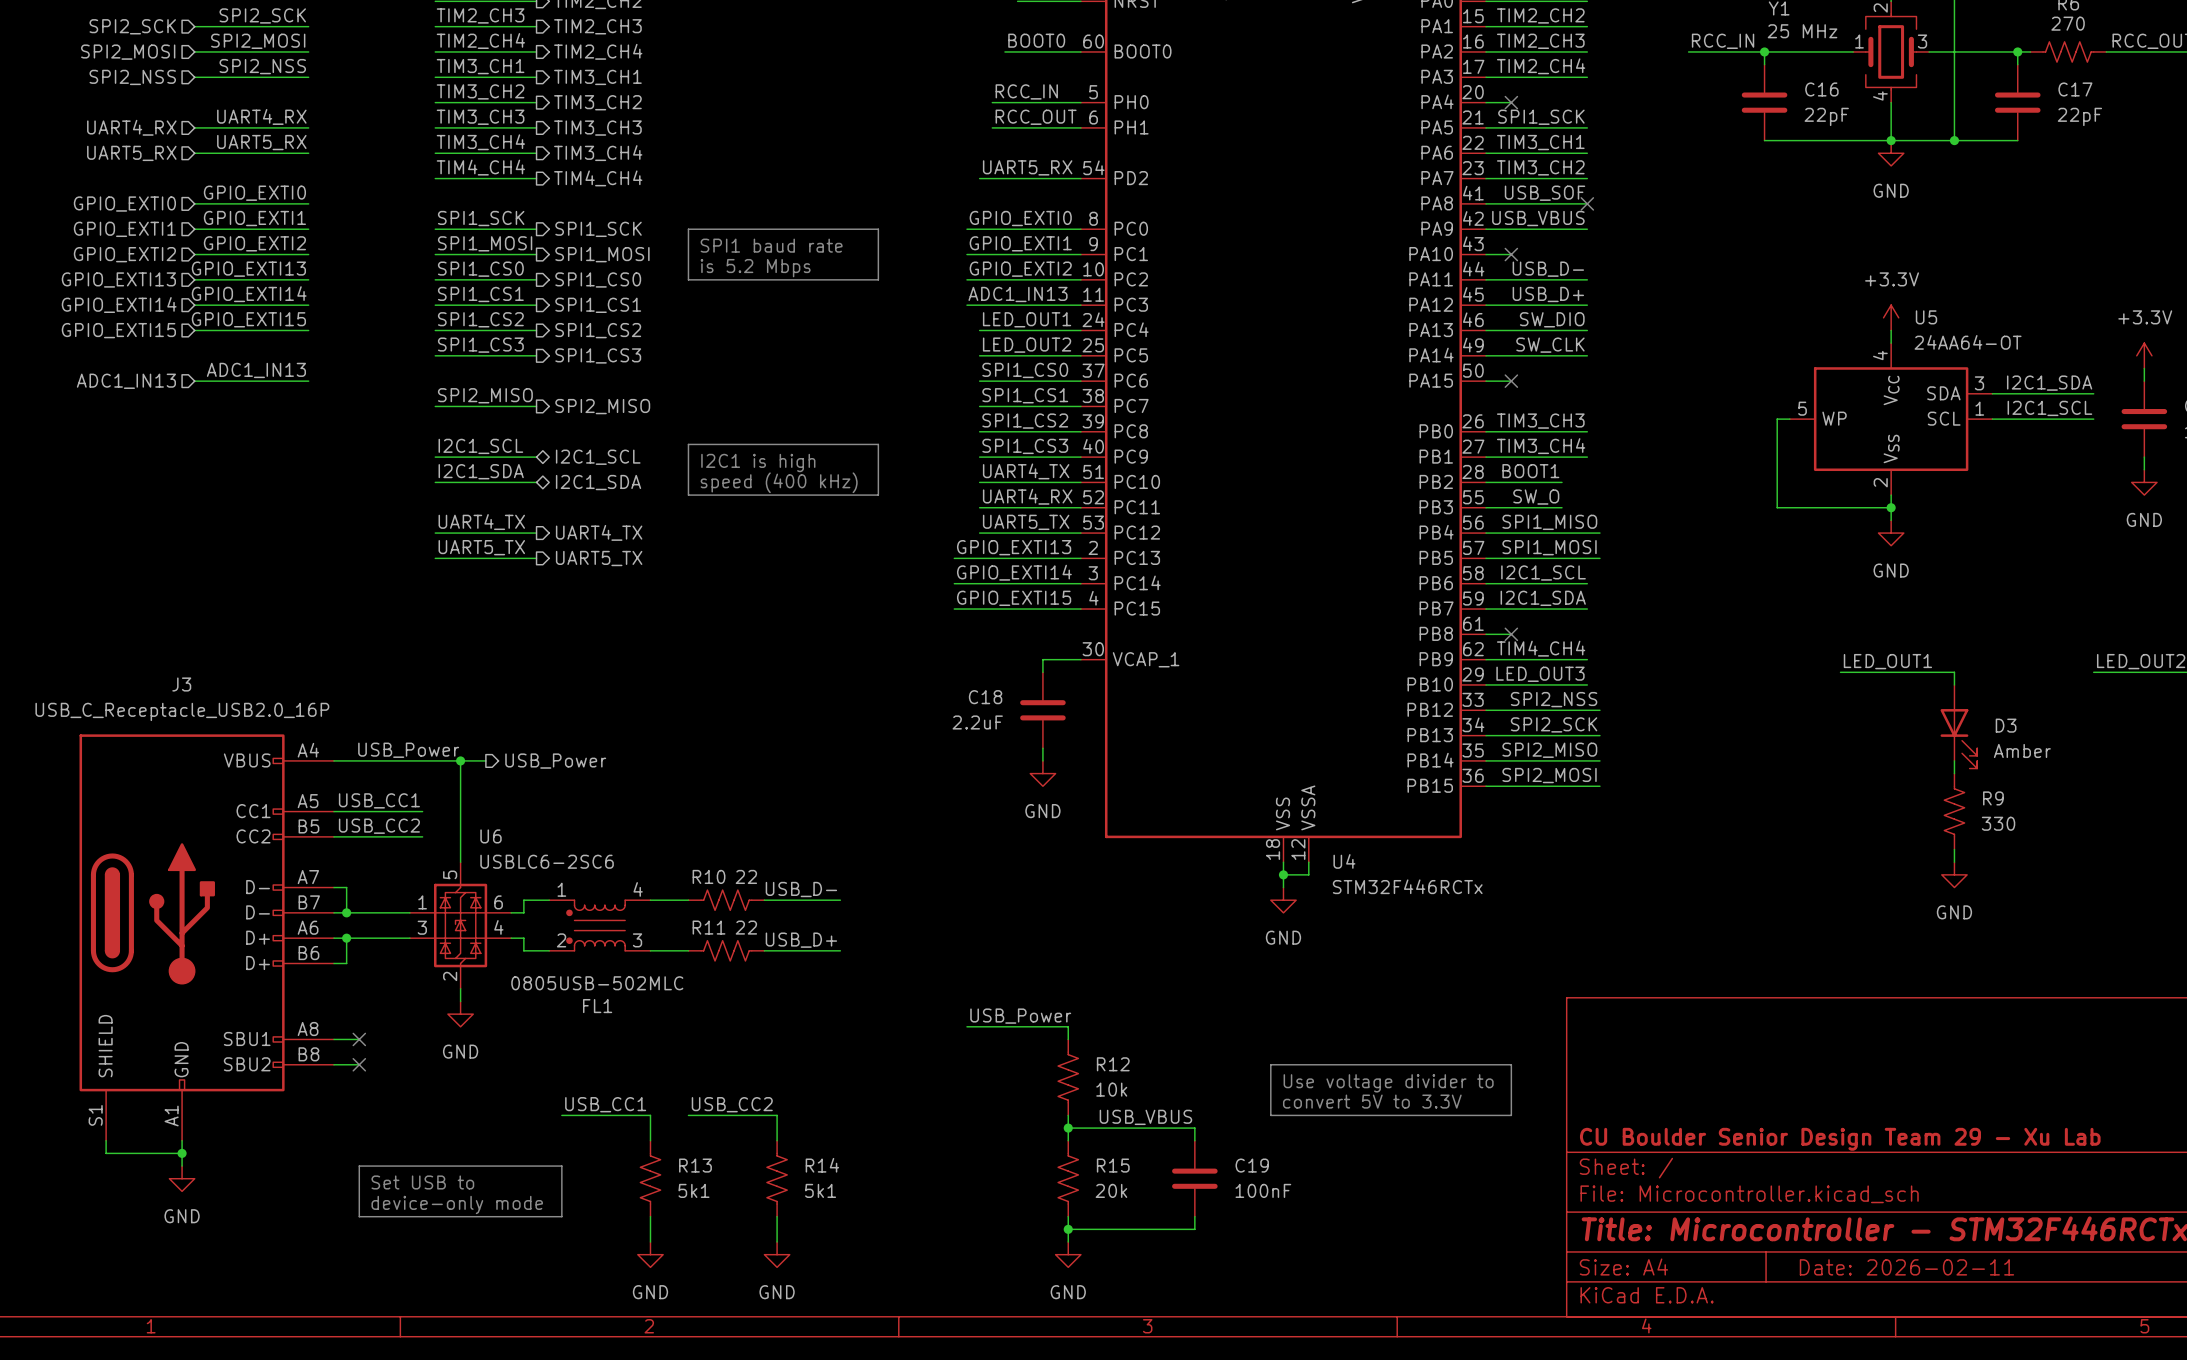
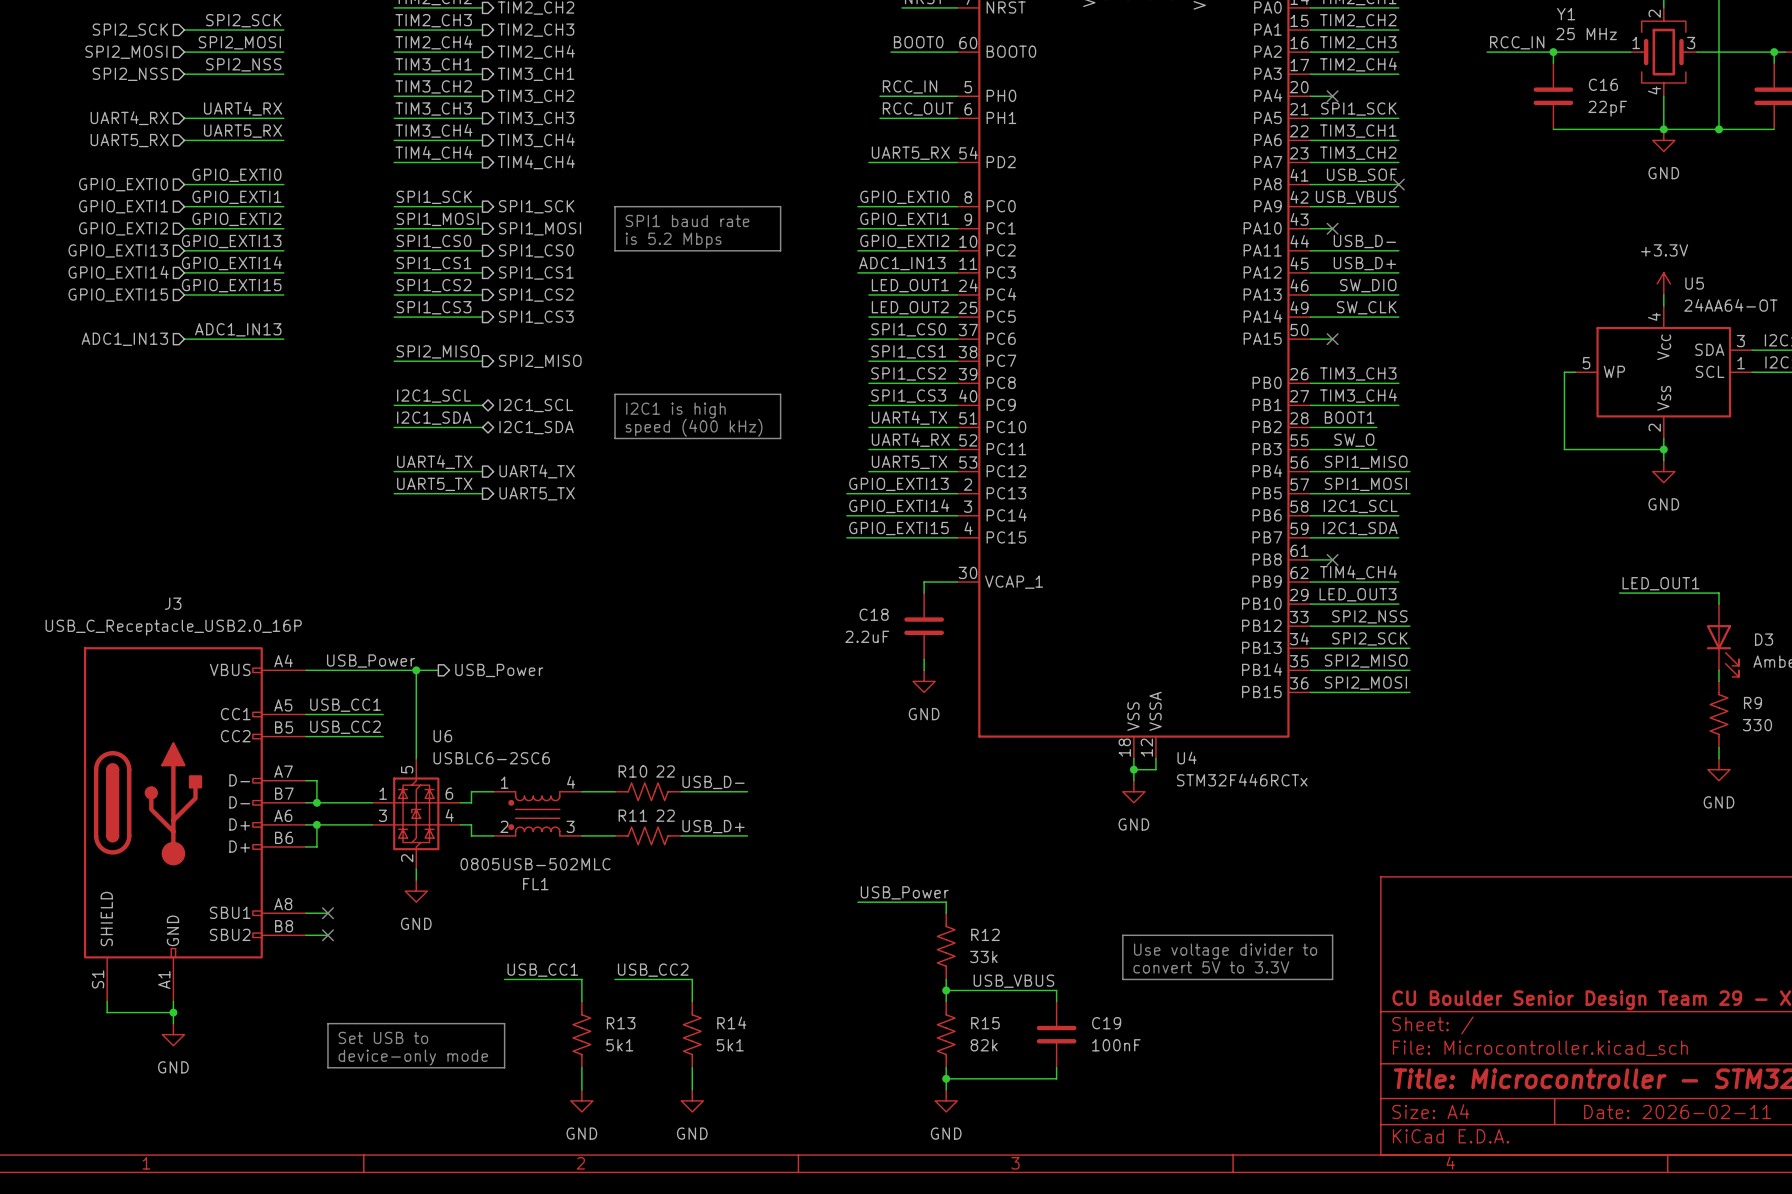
R12 value: 10k (1111, 1089) -> 33k (983, 956)
R15 value: 20k (1111, 1190) -> 82k (984, 1045)

